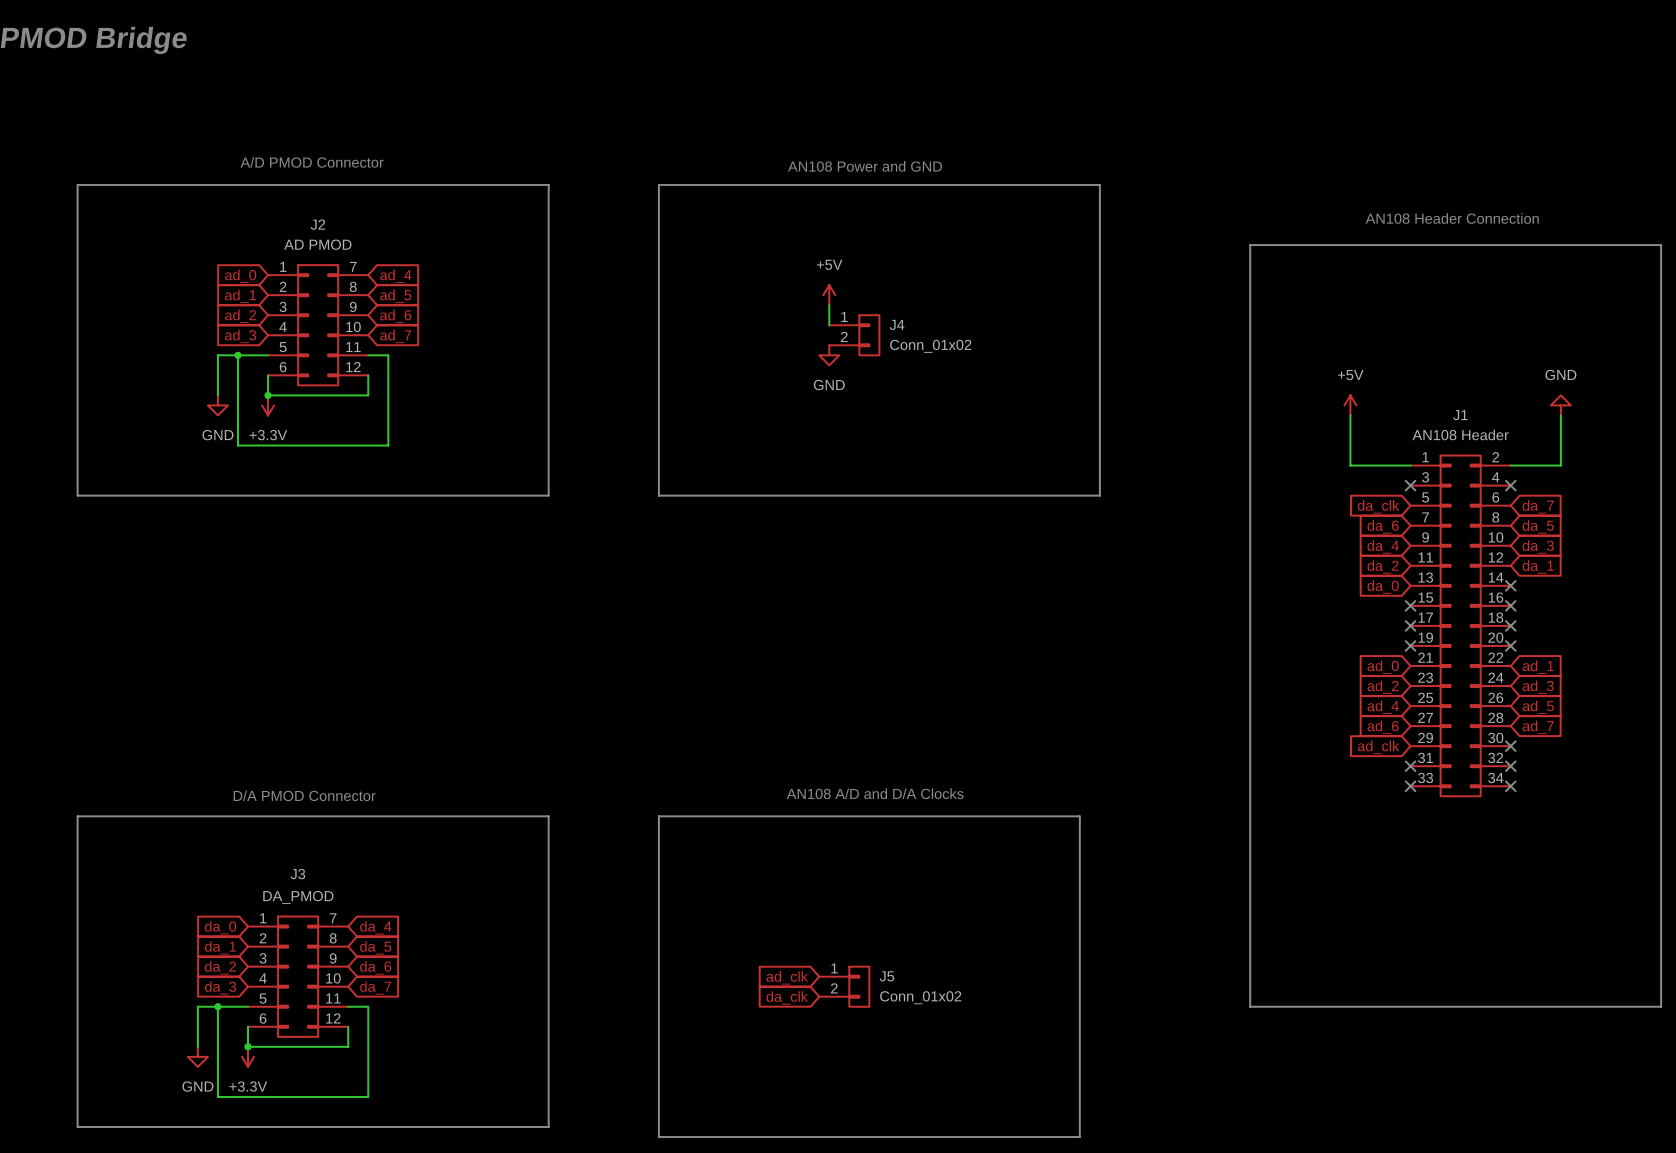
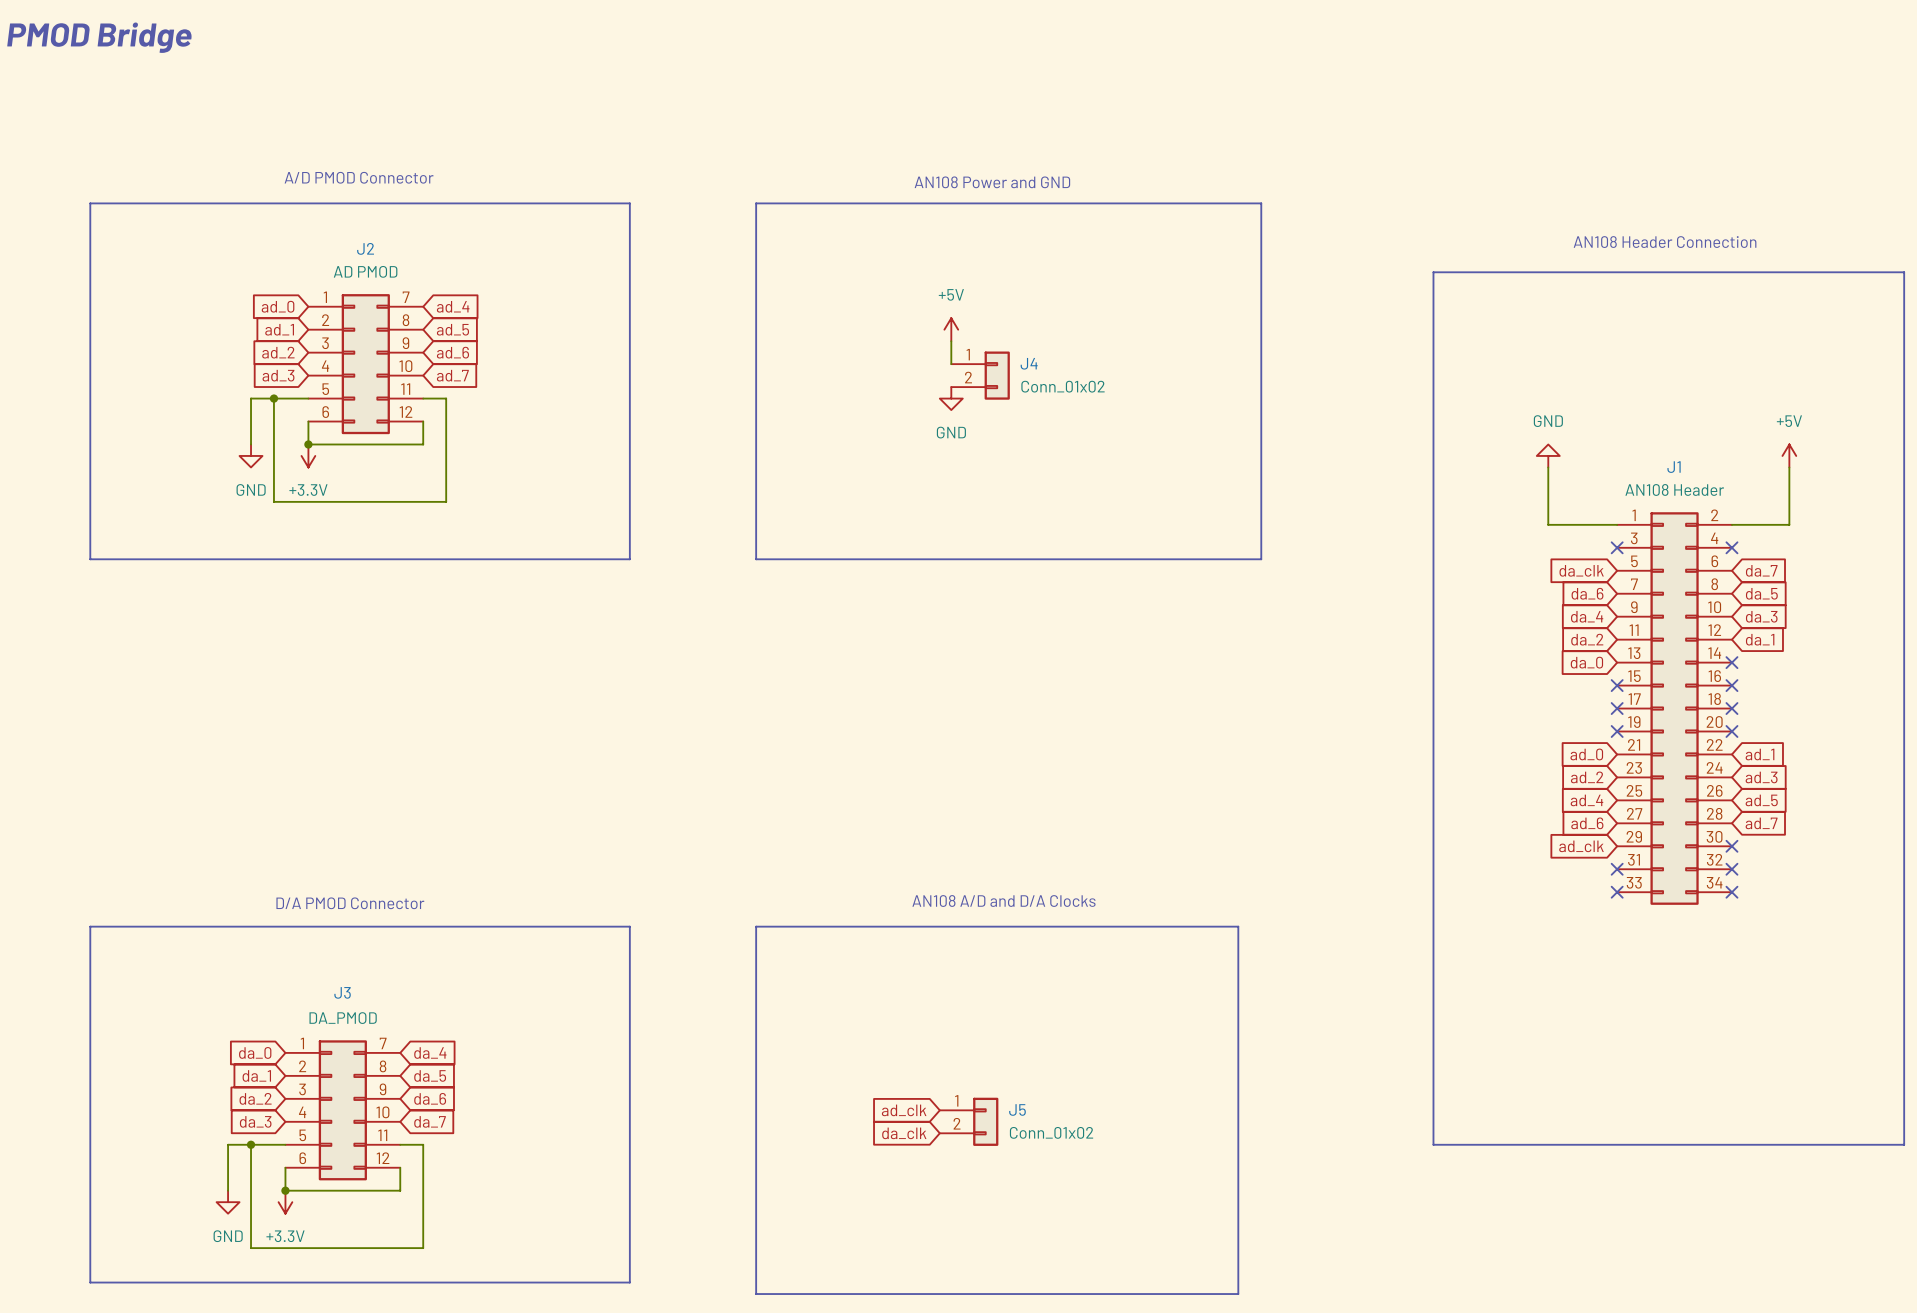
power symbol: +5V (1350, 405) -> GND (1548, 455)
power symbol: GND (1560, 405) -> +5V (1789, 455)

